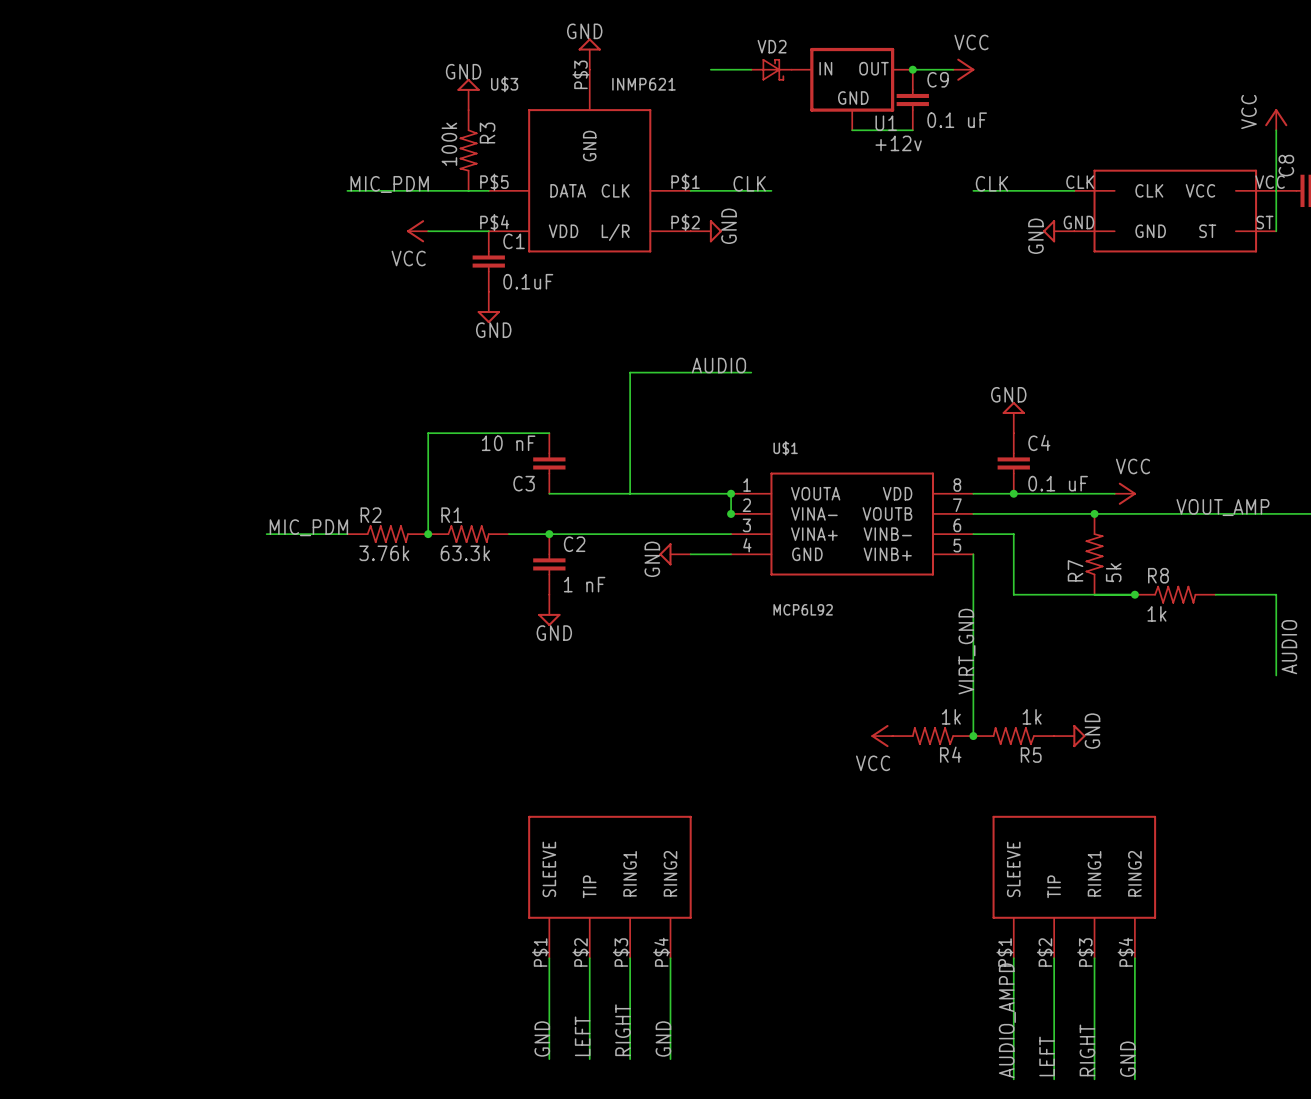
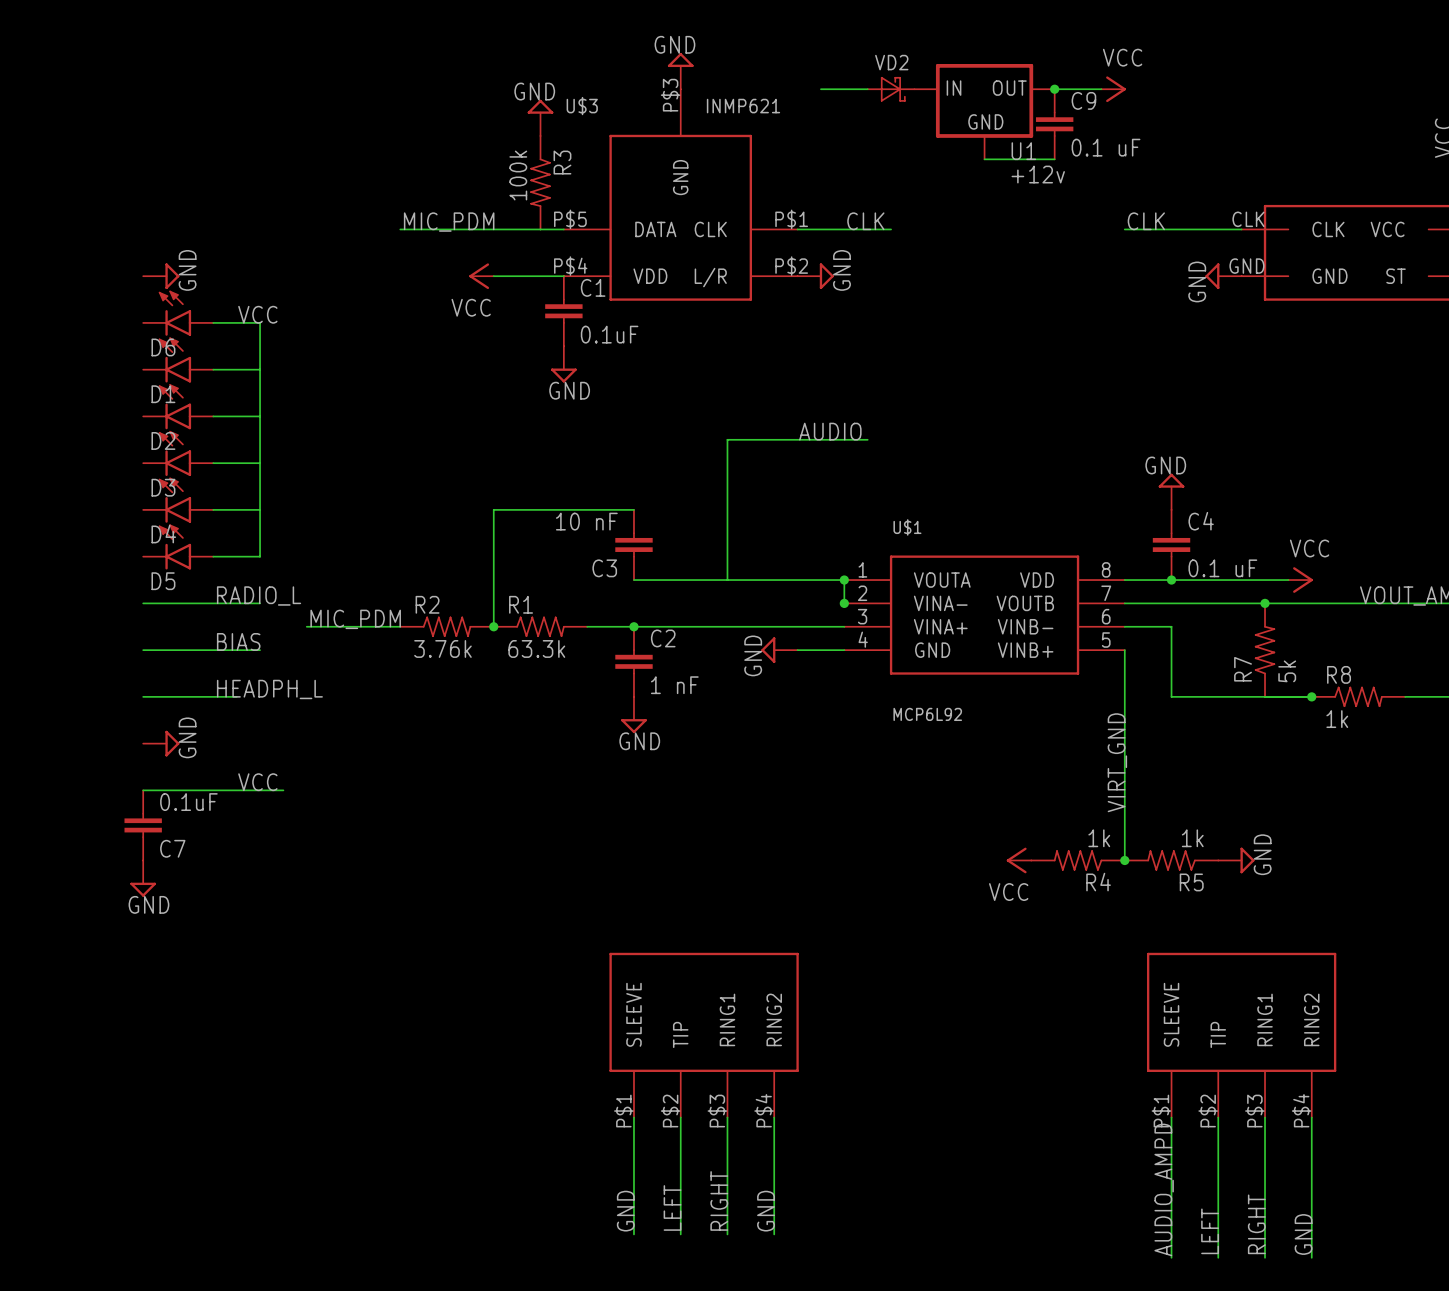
power symbol: none -> GND (161, 276)
D6: none -> (178, 313)
label: none -> VCC (257, 314)
wire: none -> (213, 322) (260, 322) (260, 556) (213, 556)
D1: none -> (178, 359)
wire: none -> (213, 369) (260, 369)
D2: none -> (178, 406)
wire: none -> (213, 416) (260, 416)
D3: none -> (178, 453)
wire: none -> (213, 463) (260, 463)
D4: none -> (178, 500)
wire: none -> (213, 509) (260, 509)
D5: none -> (178, 546)
label: none -> RADIO_L (259, 596)
wire: none -> (143, 603) (260, 603)
label: none -> BIAS (238, 641)
wire: none -> (143, 650) (260, 650)
label: none -> HEADPH_L (269, 689)
wire: none -> (143, 696) (236, 696)
power symbol: none -> GND (161, 743)
label: none -> VCC (257, 782)
wire: none -> (143, 790) (283, 790)
C7: none -> 0.1uF (143, 825)
power symbol: none -> GND (143, 878)

